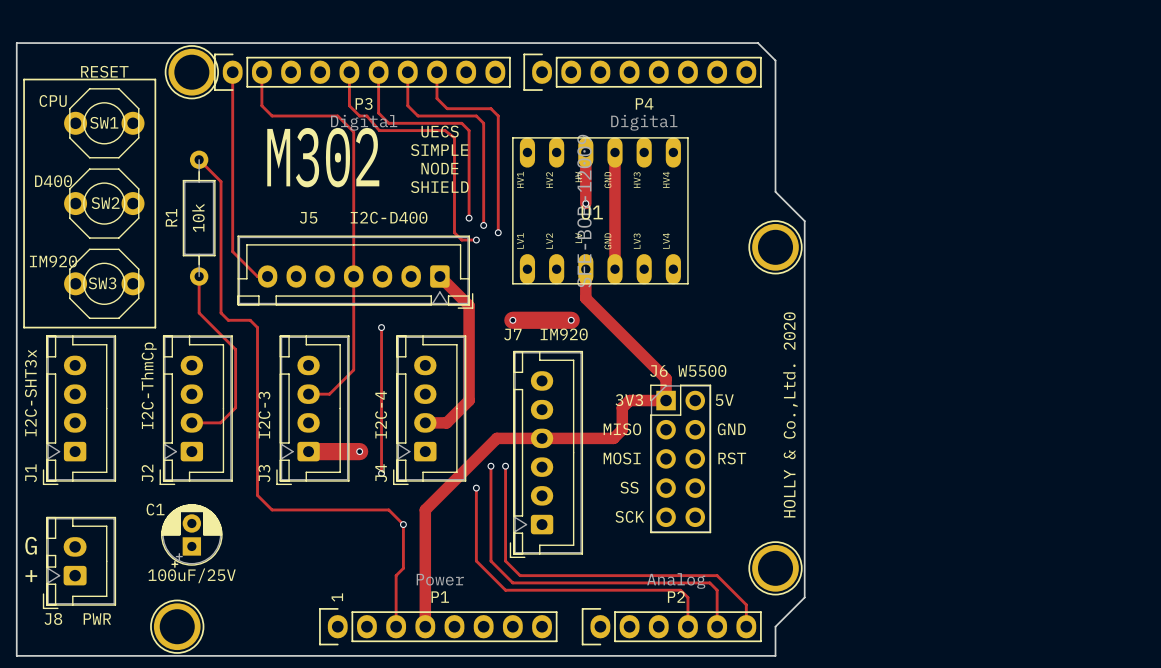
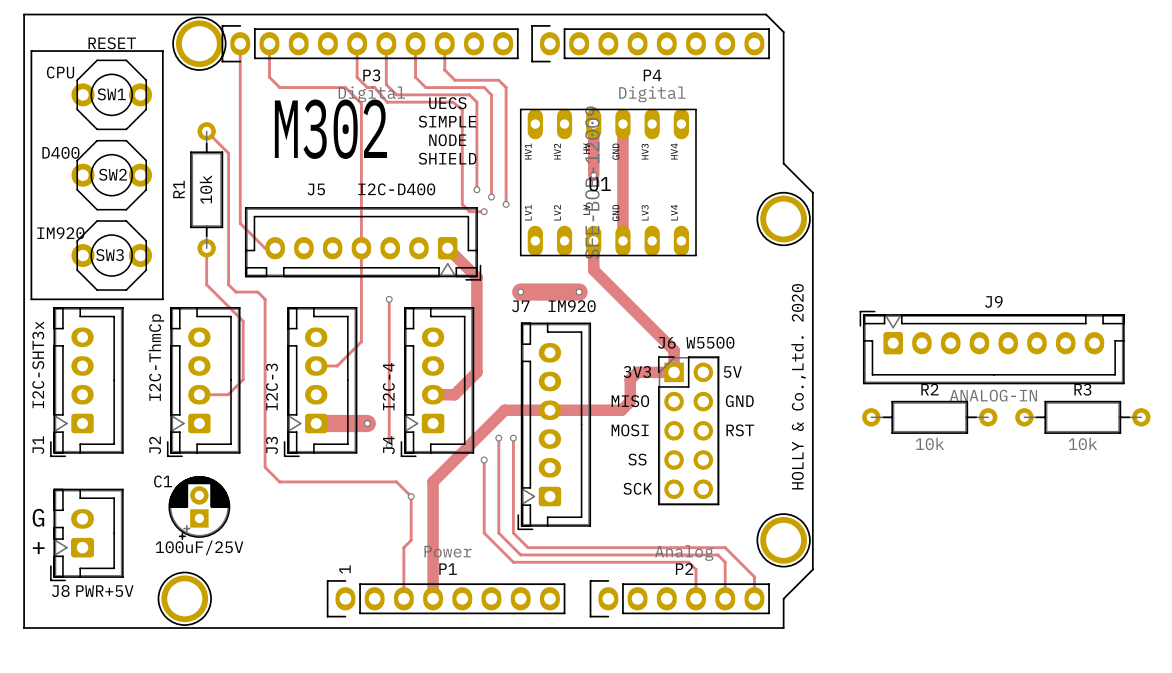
J9: none -> ANALOG-IN (992, 347)
R2: none -> 10k (929, 417)
R3: none -> 10k (1082, 417)
J8 value: PWR (97, 618) -> PWR+5V (104, 591)

